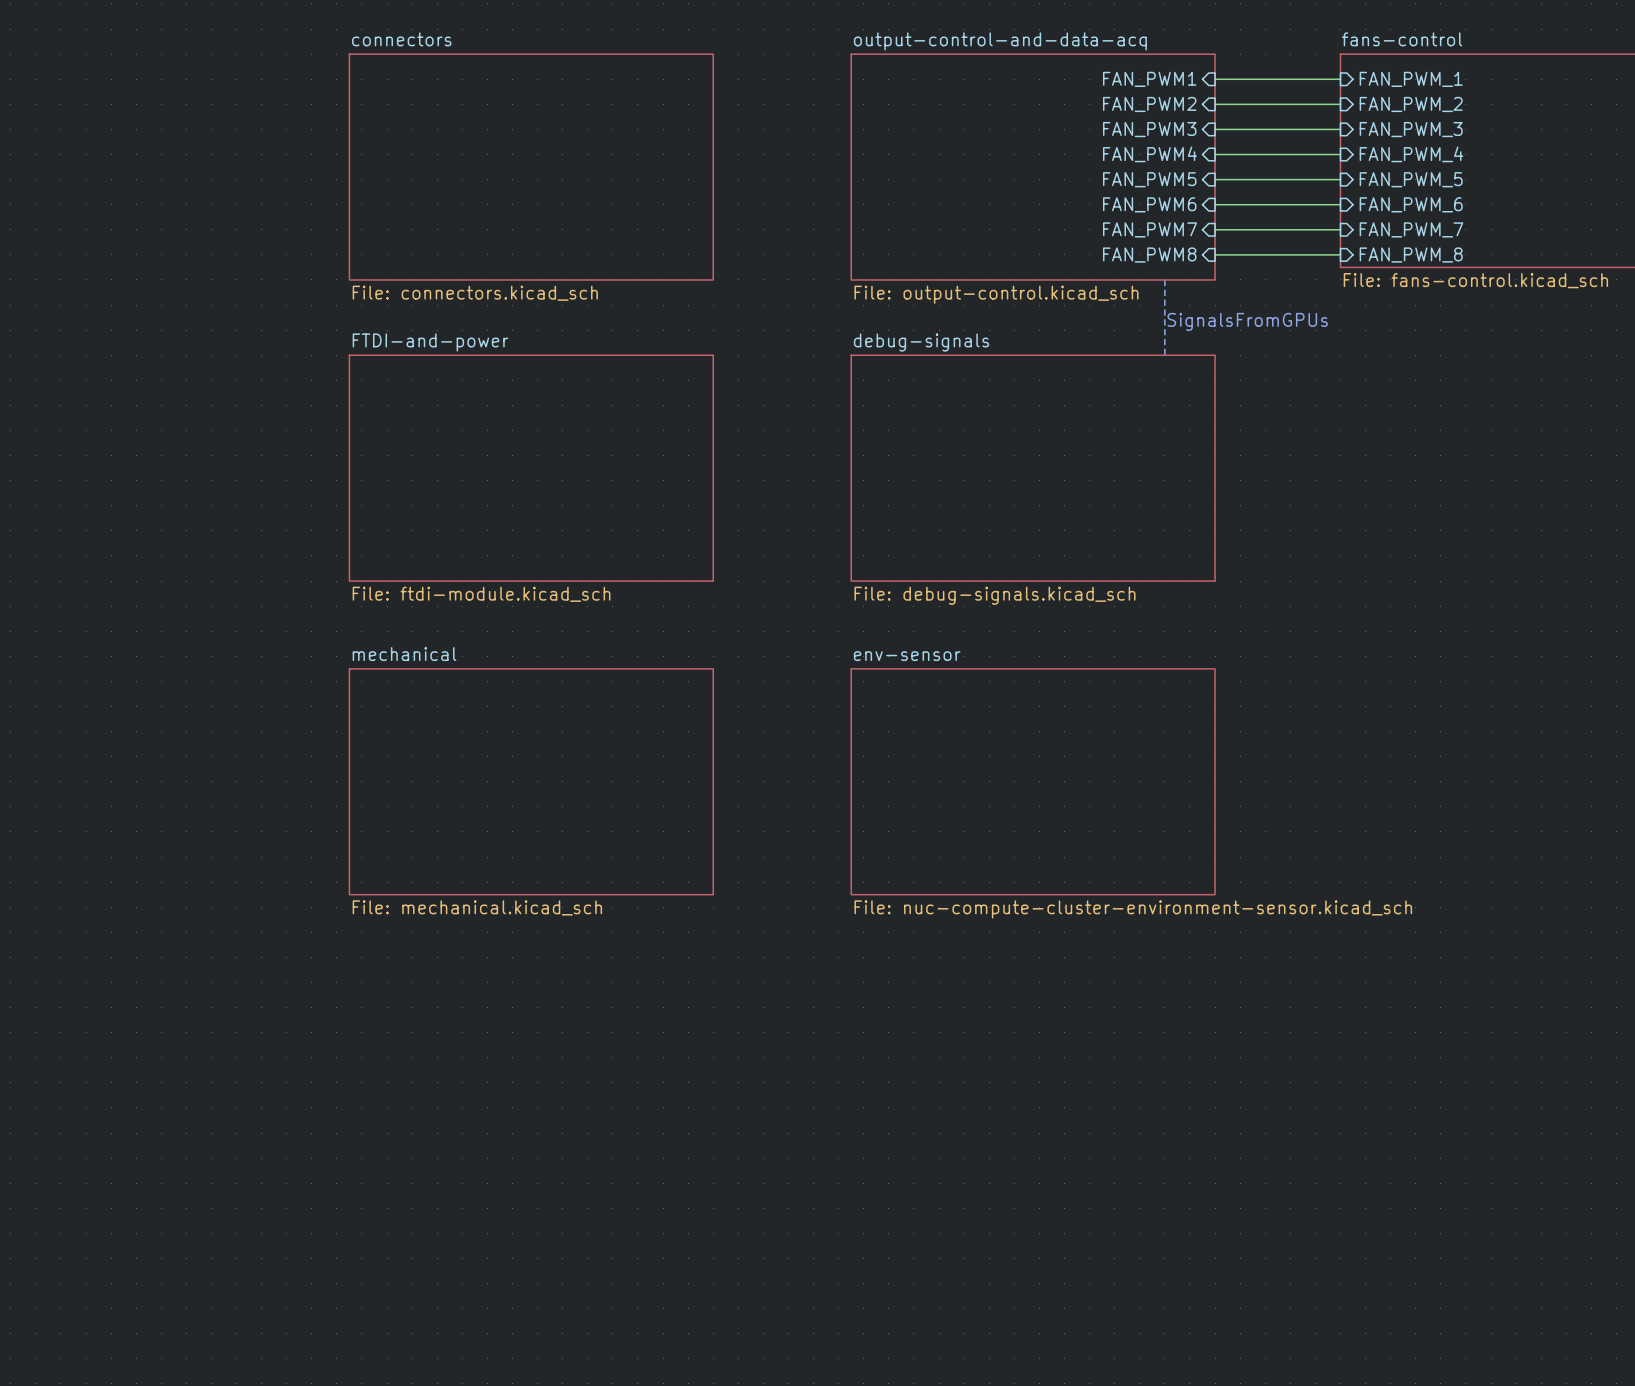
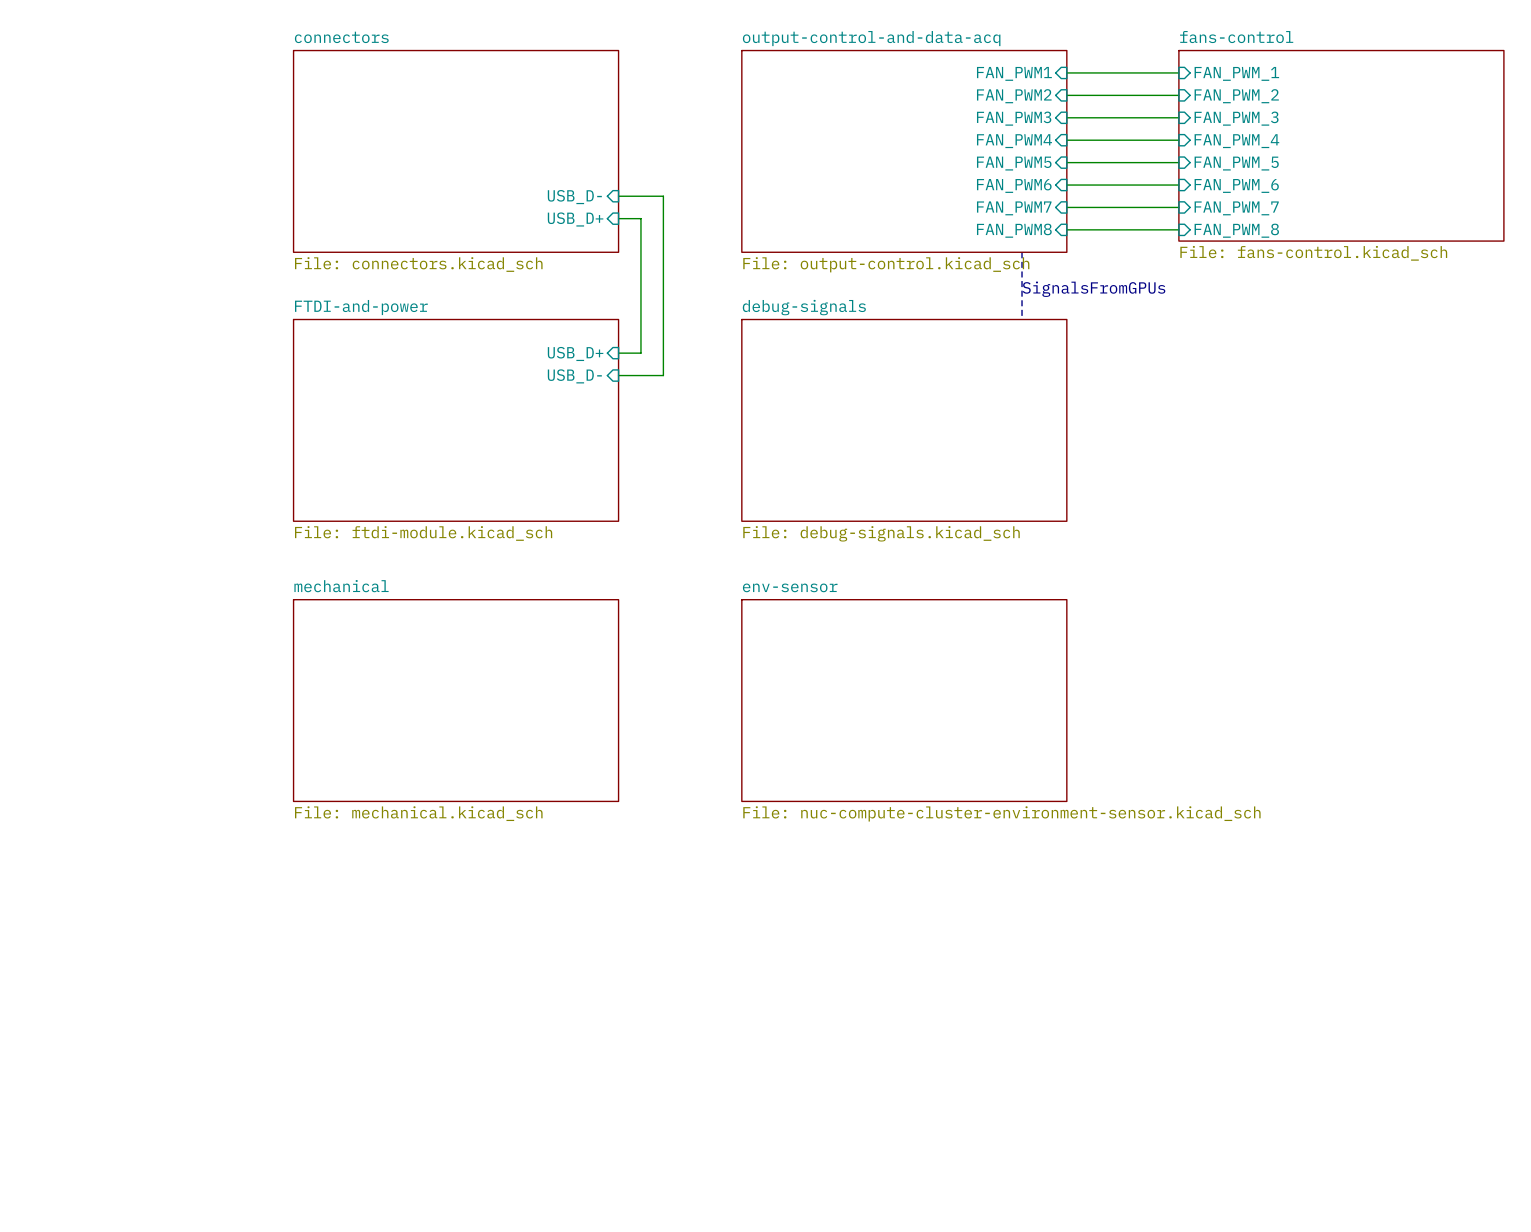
sheet pin: none -> USB_D- (574, 197)
wire: none -> (618, 196) (663, 196) (663, 375) (618, 375)
sheet pin: none -> USB_D+ (575, 219)
wire: none -> (618, 218) (640, 218) (640, 353) (618, 353)
sheet pin: none -> USB_D+ (575, 353)
sheet pin: none -> USB_D- (574, 376)

